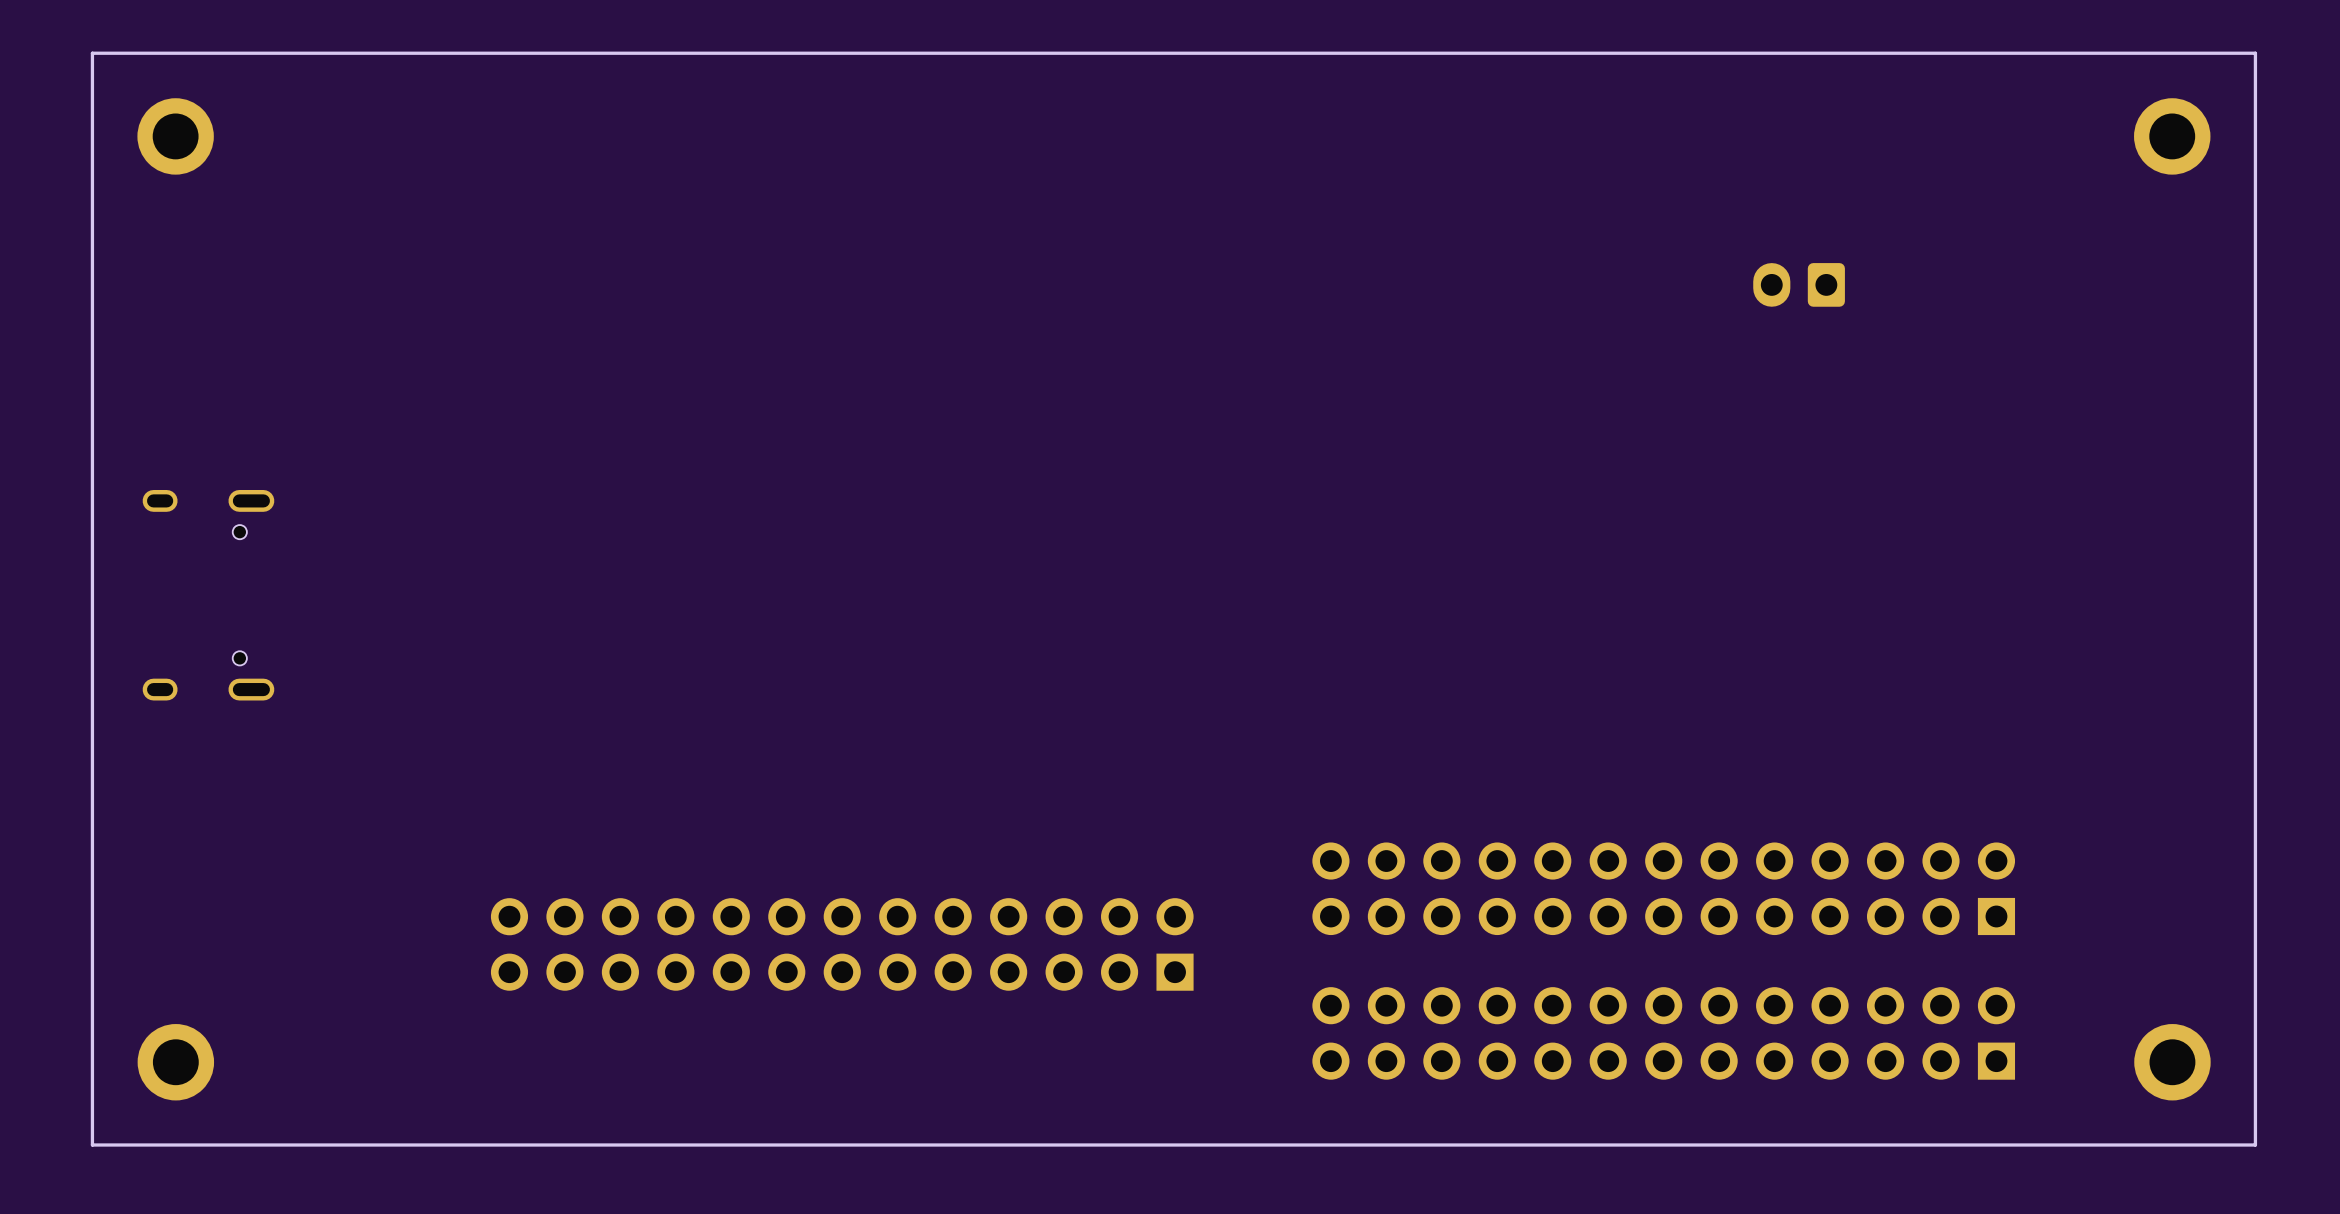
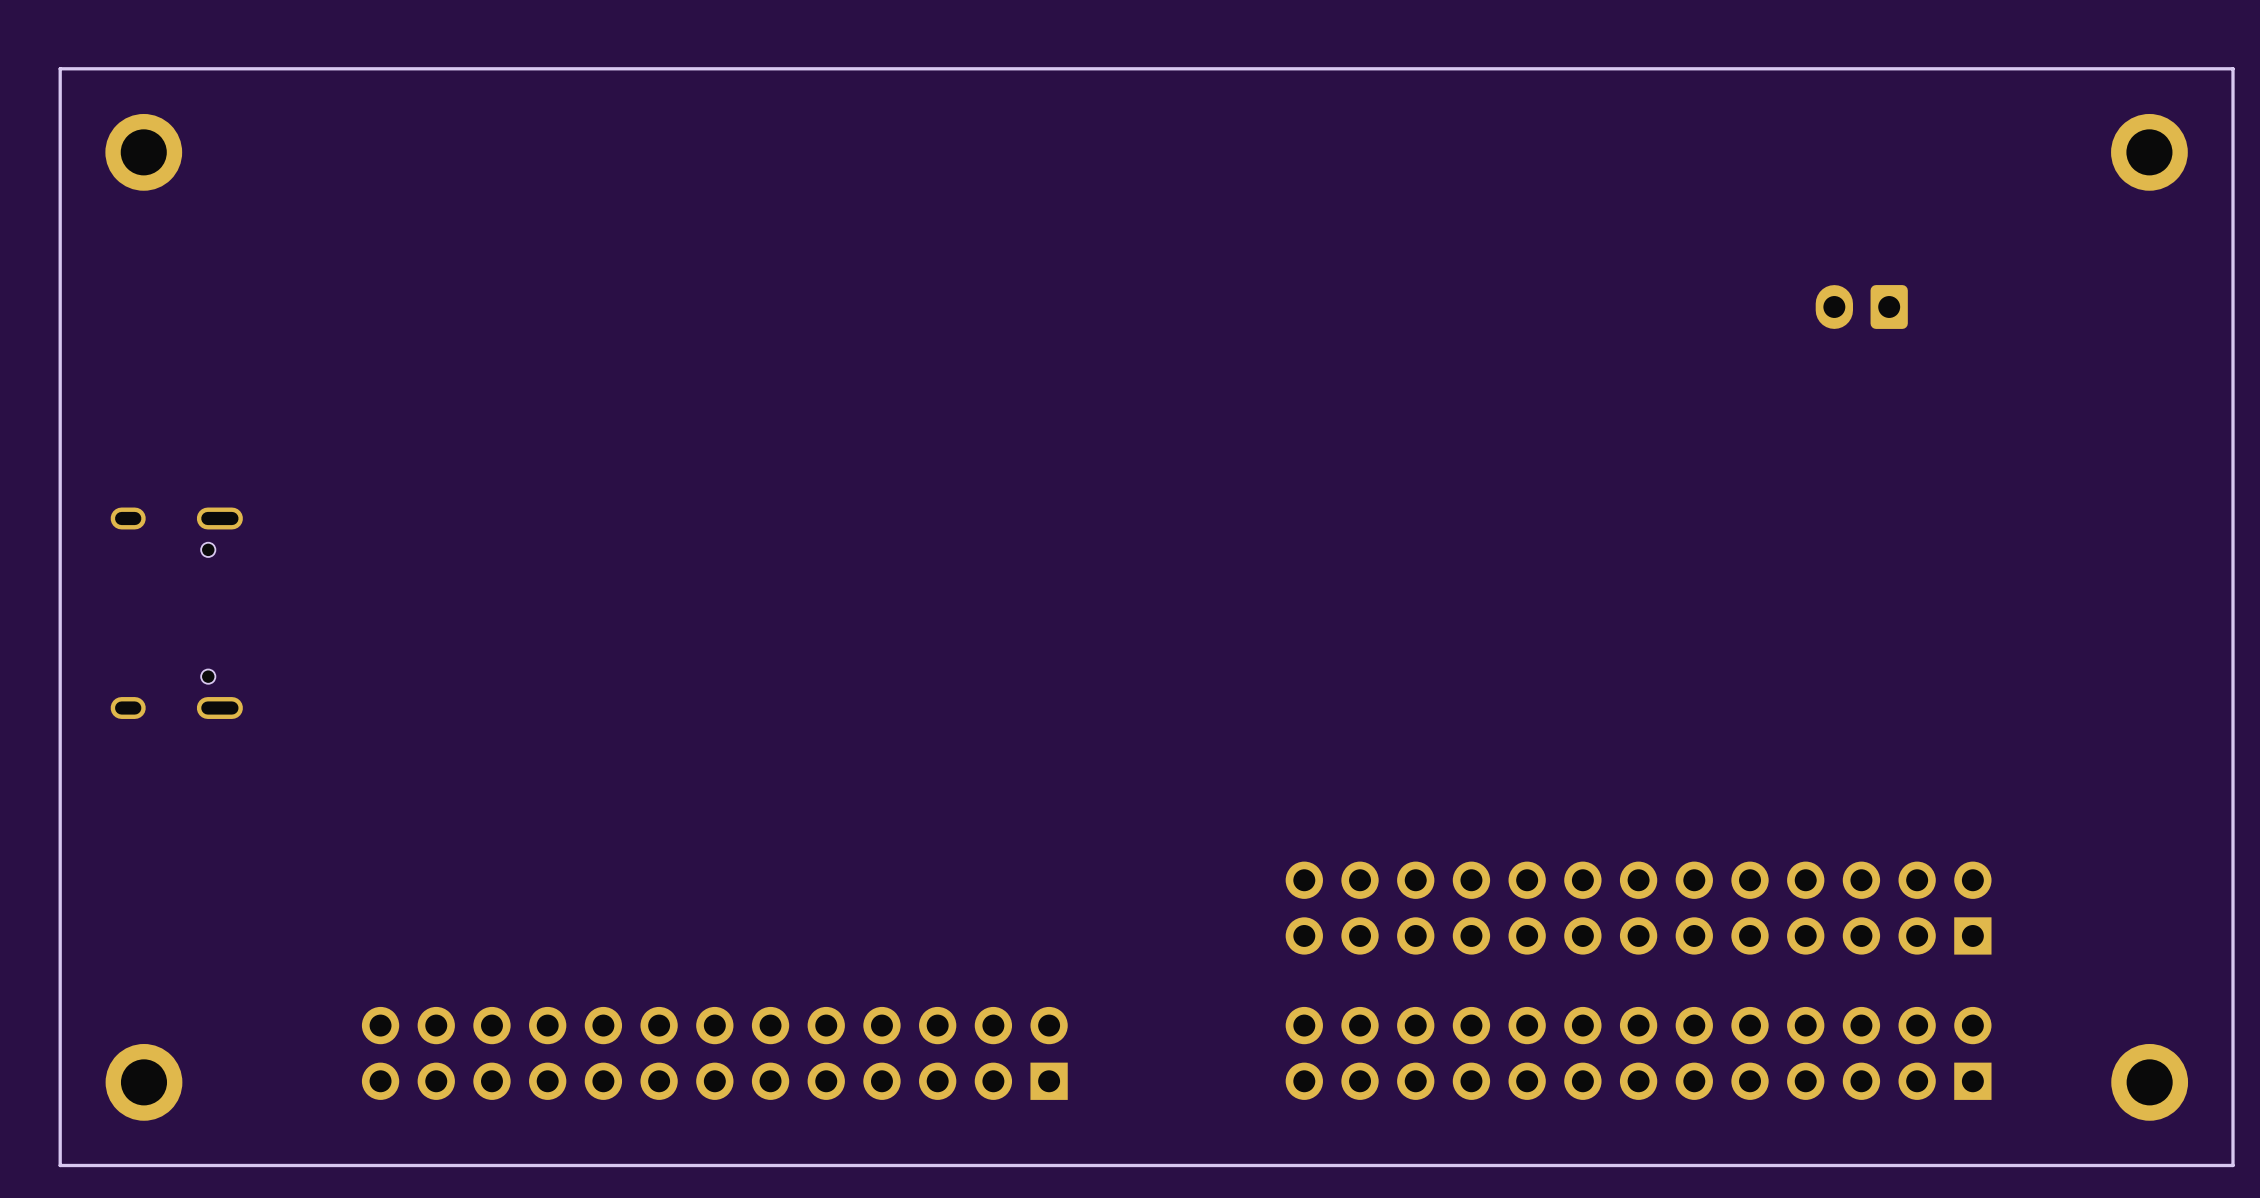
part position: (1799, 284) -> (1861, 306)
part position: (842, 944) -> (714, 1053)

